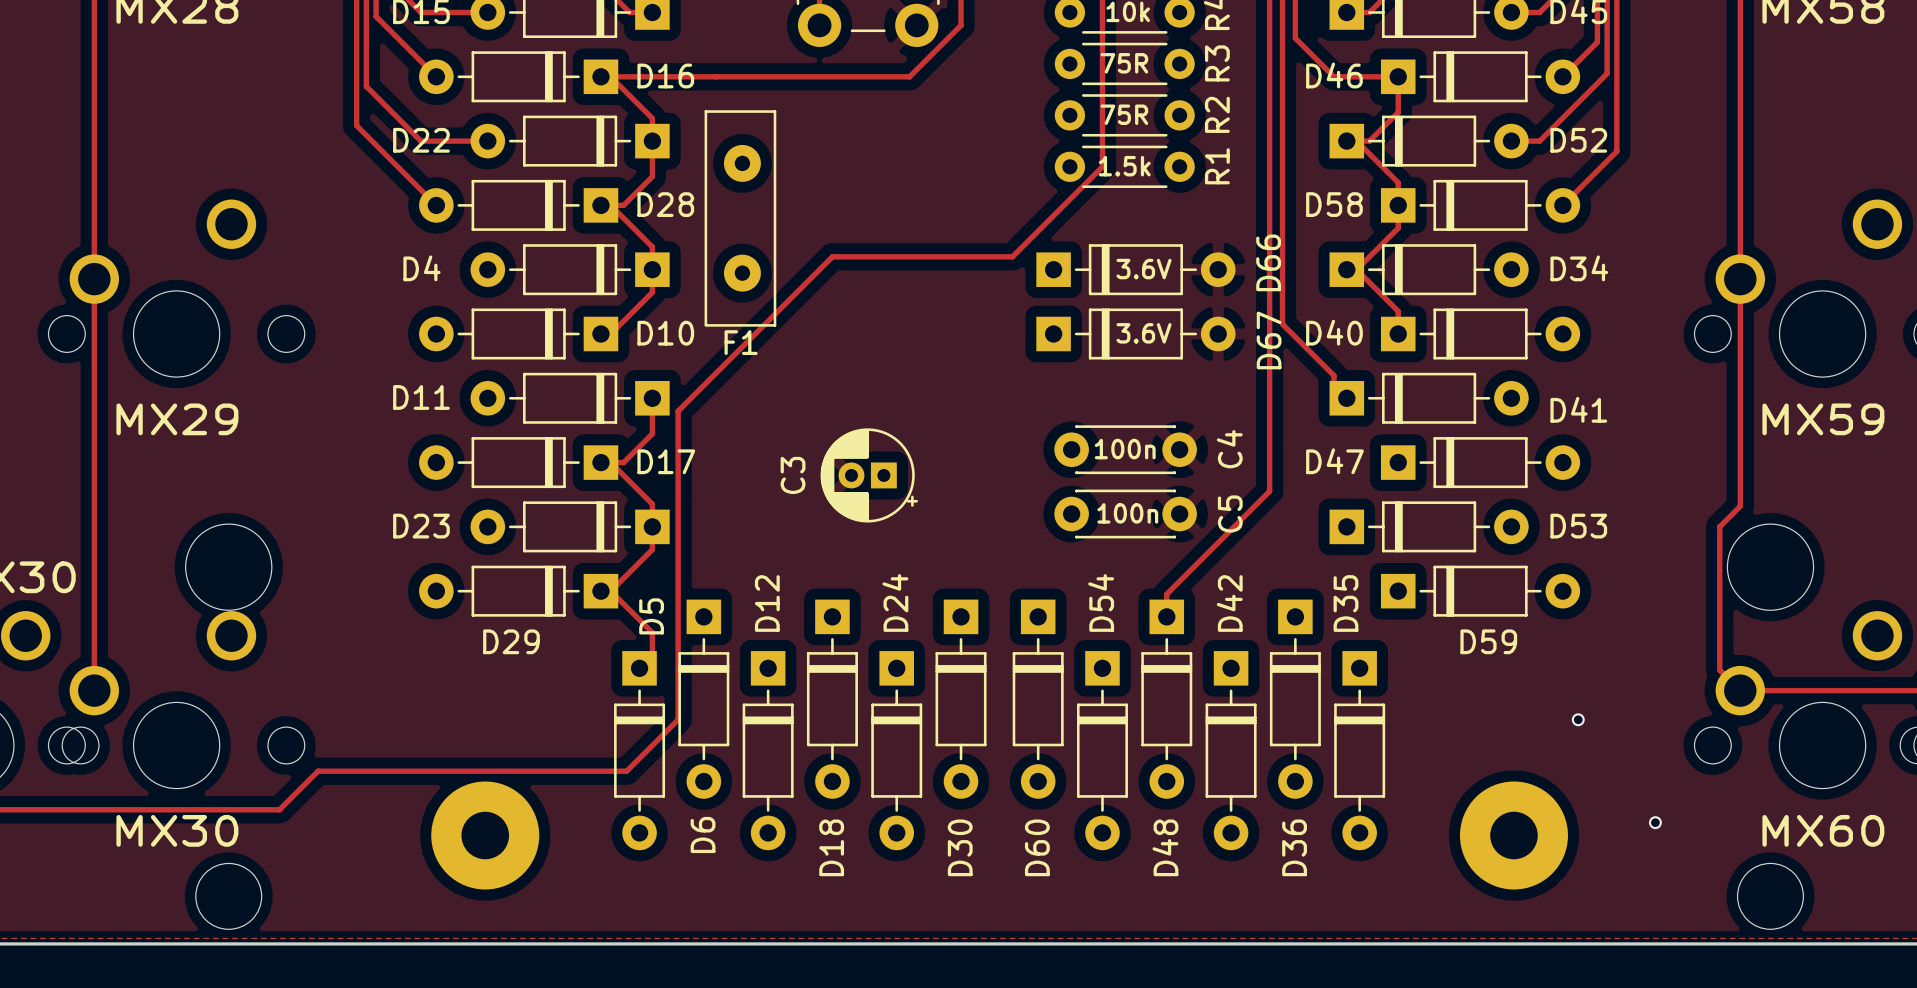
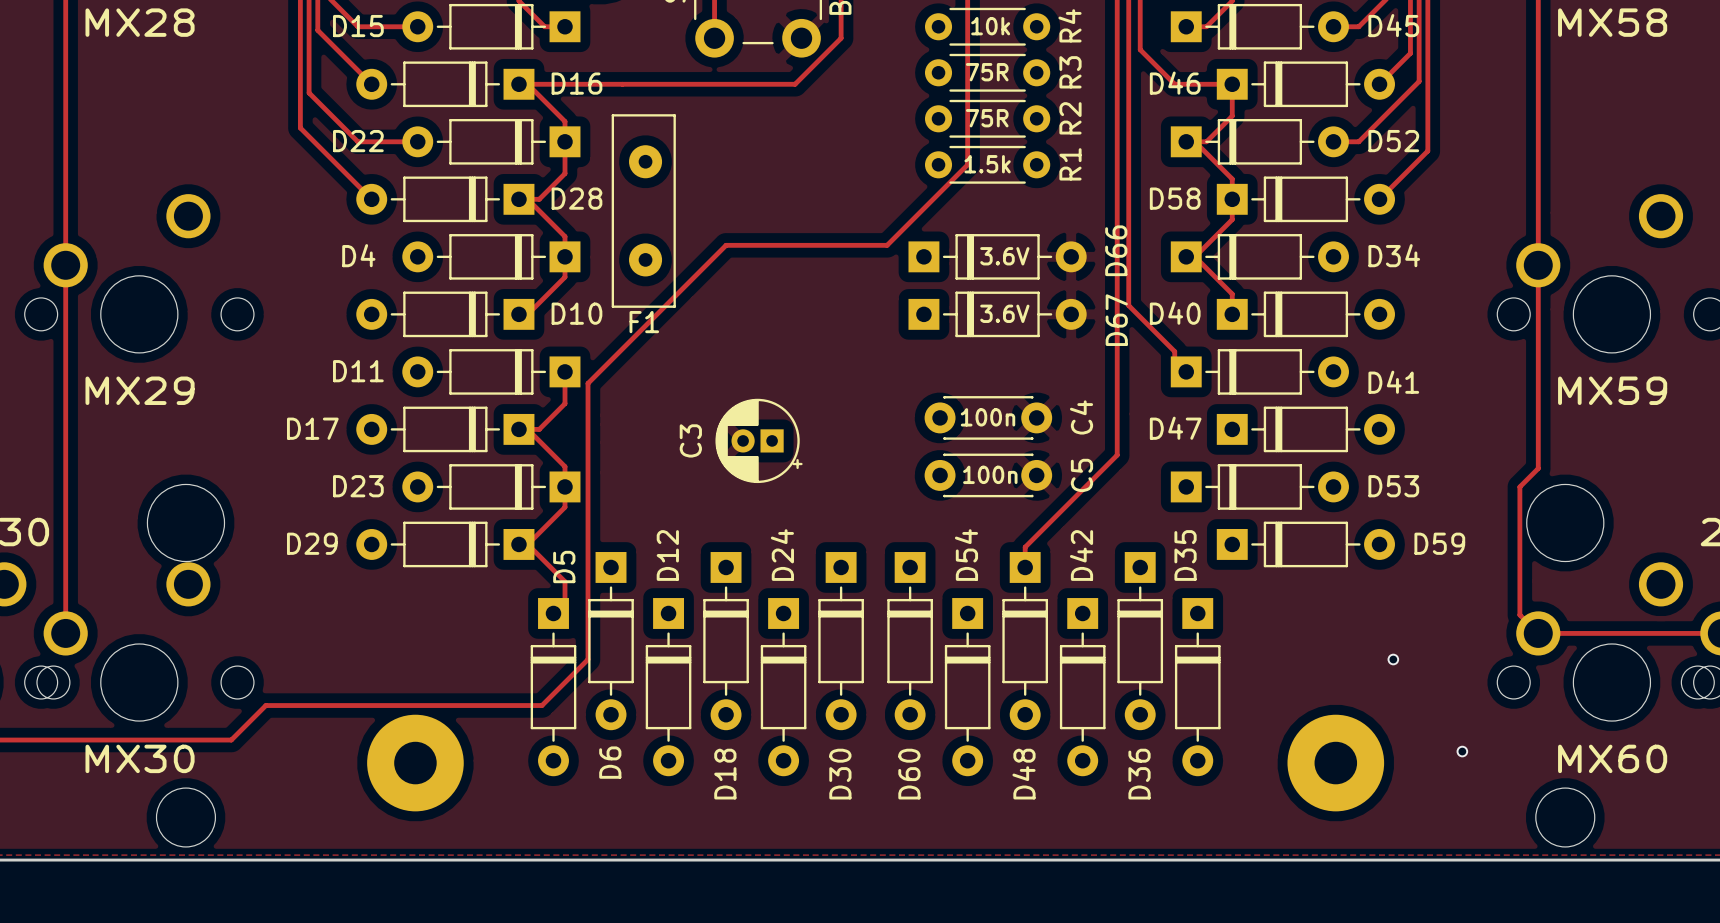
D17 name position: D17 (666, 461) -> D17 (312, 428)
D29 name position: D29 (511, 641) -> D29 (312, 543)
D59 name position: D59 (1488, 641) -> D59 (1439, 543)

